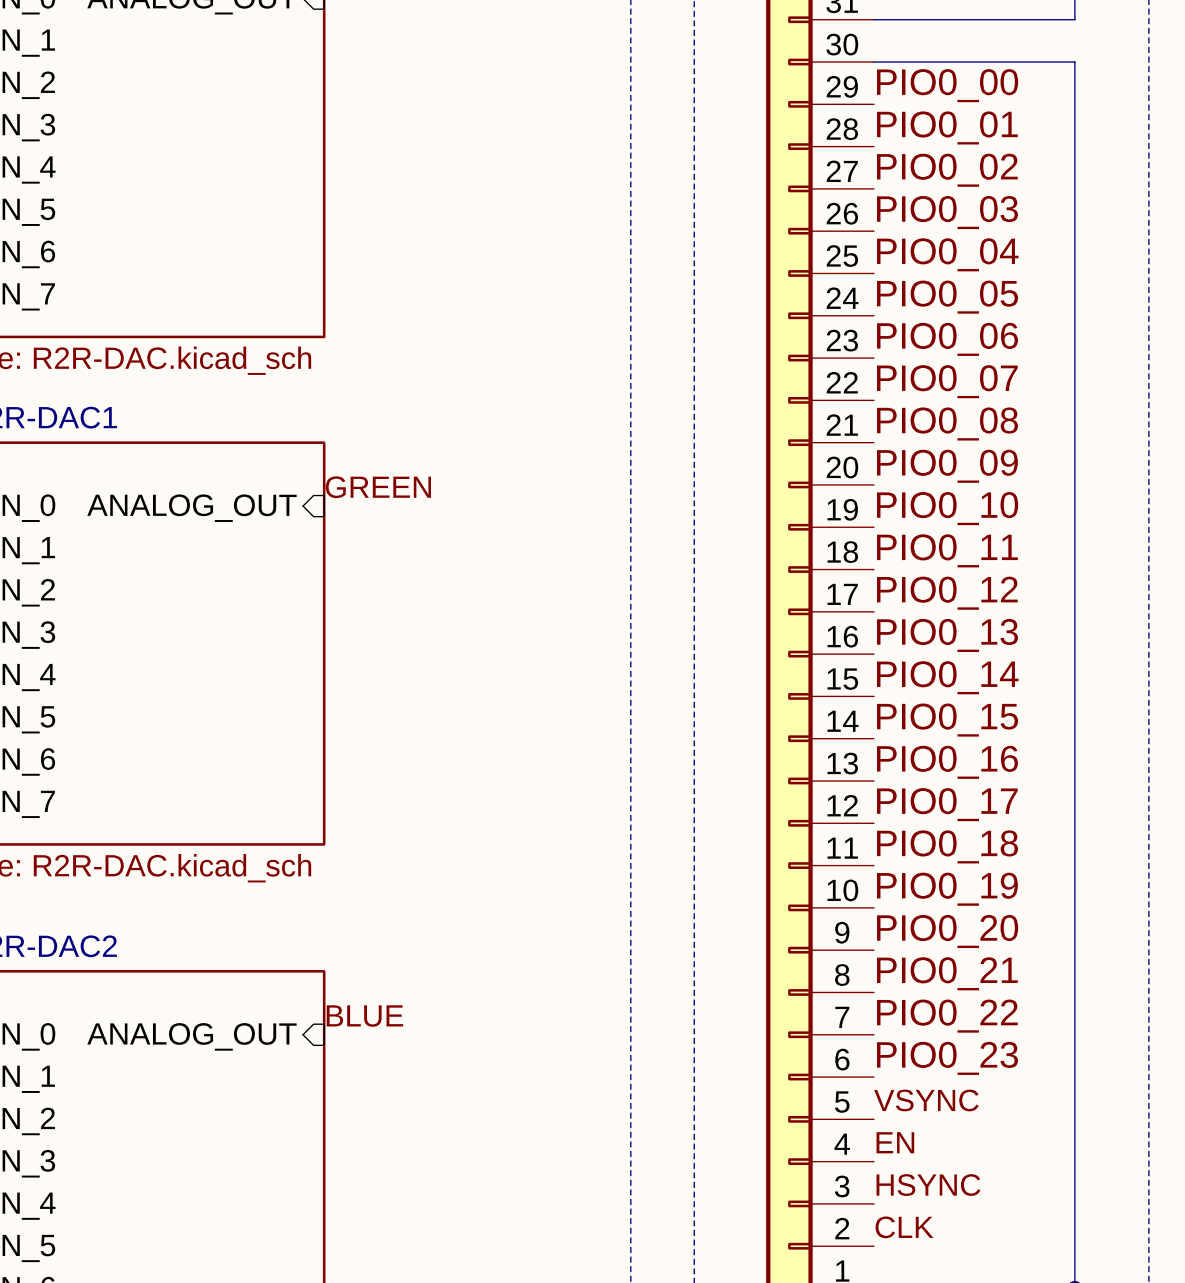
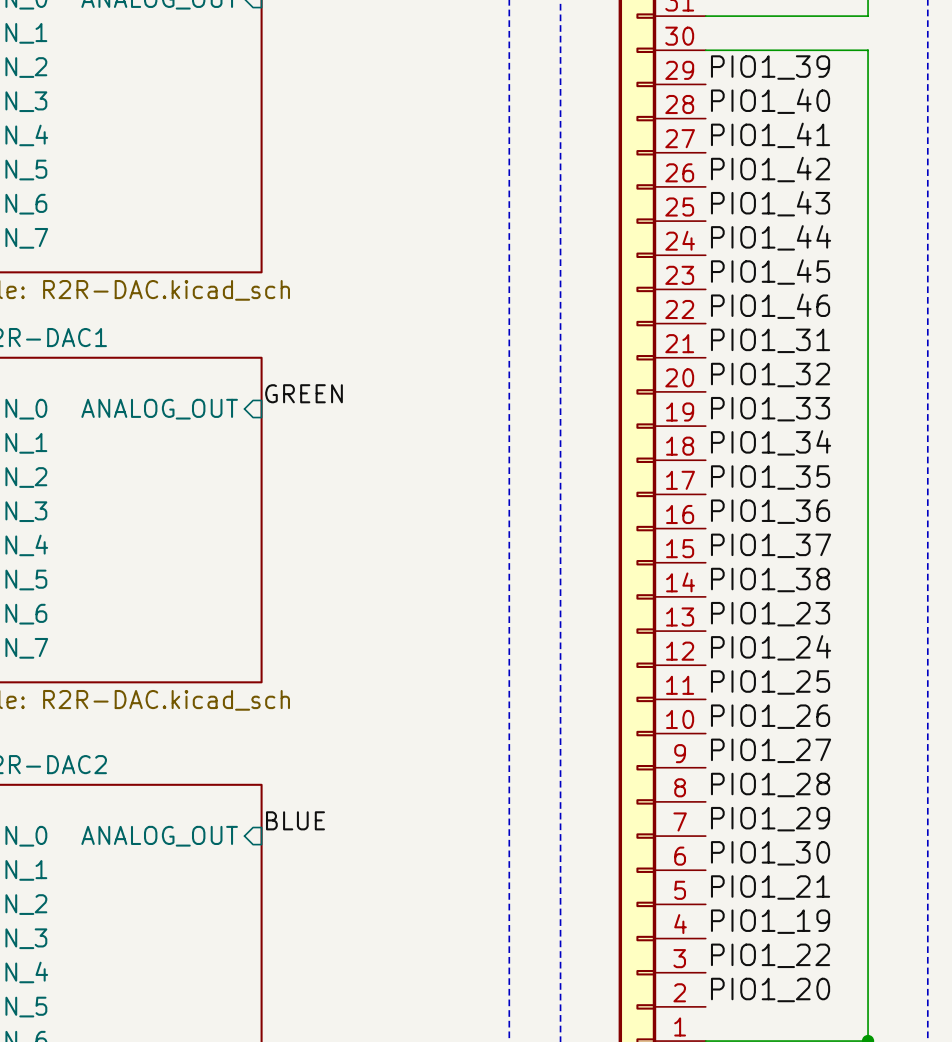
label: PIO0_00 (947, 85) -> PIO1_39 (770, 67)
label: PIO0_01 (947, 127) -> PIO1_40 (770, 101)
label: PIO0_02 (947, 170) -> PIO1_41 (770, 135)
label: PIO0_03 (947, 212) -> PIO1_42 (770, 169)
label: PIO0_04 (947, 254) -> PIO1_43 (770, 203)
label: PIO0_05 (947, 297) -> PIO1_44 (771, 237)
label: PIO0_06 (947, 339) -> PIO1_45 (770, 272)
label: PIO0_07 (947, 381) -> PIO1_46 (770, 306)
label: PIO0_08 (947, 424) -> PIO1_31 (770, 340)
label: PIO0_09 (947, 466) -> PIO1_32 (770, 375)
label: PIO0_10 (947, 508) -> PIO1_33 (770, 409)
label: PIO0_11 (947, 550) -> PIO1_34 (771, 442)
label: PIO0_12 (947, 593) -> PIO1_35 (770, 477)
label: PIO0_13 (947, 635) -> PIO1_36 (770, 511)
label: PIO0_14 (947, 677) -> PIO1_37 (771, 545)
label: PIO0_15 (947, 720) -> PIO1_38 (770, 580)
label: PIO0_16 (947, 762) -> PIO1_23 (770, 614)
label: PIO0_17 (947, 804) -> PIO1_24 (771, 647)
label: PIO0_18 (947, 846) -> PIO1_25 (770, 682)
label: PIO0_19 (947, 889) -> PIO1_26 (770, 716)
label: PIO0_20 (947, 931) -> PIO1_27 (771, 750)
label: PIO0_21 (947, 973) -> PIO1_28 (770, 784)
label: PIO0_22 (947, 1016) -> PIO1_29 (770, 819)
label: PIO0_23 (947, 1058) -> PIO1_30 (770, 853)
label: VSYNC (926, 1100) -> PIO1_21 (770, 887)
label: EN (895, 1142) -> PIO1_19 (770, 921)
label: HSYNC (928, 1185) -> PIO1_22 (770, 955)
label: CLK (904, 1227) -> PIO1_20 (770, 989)

